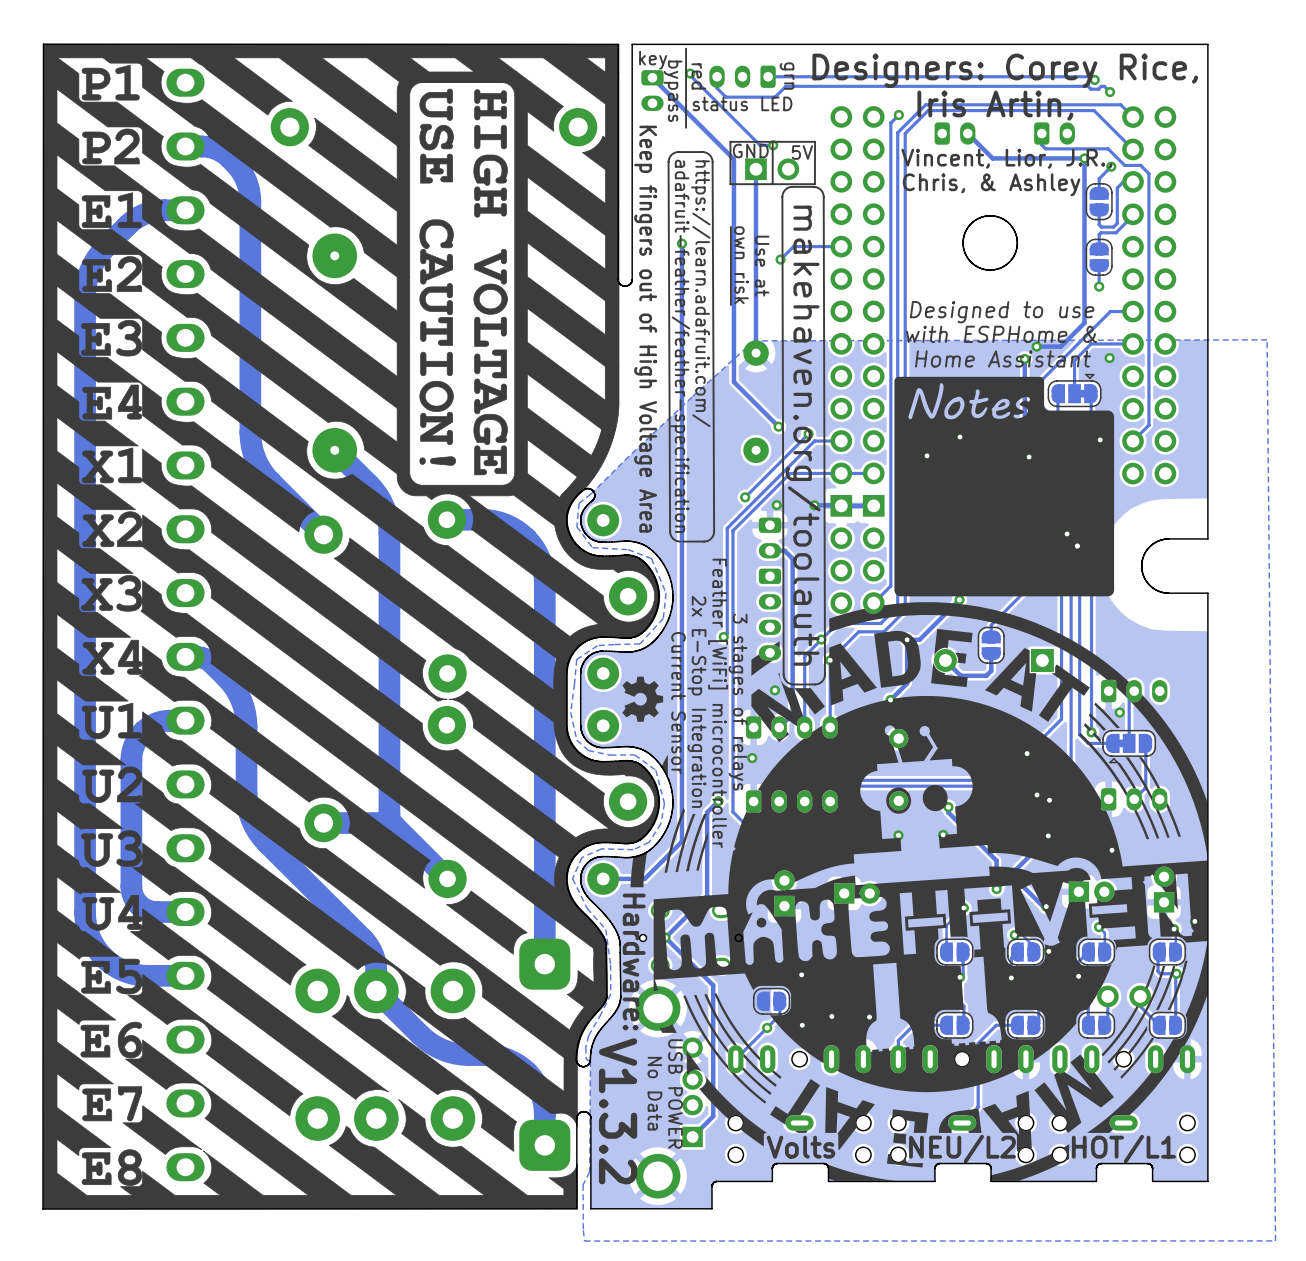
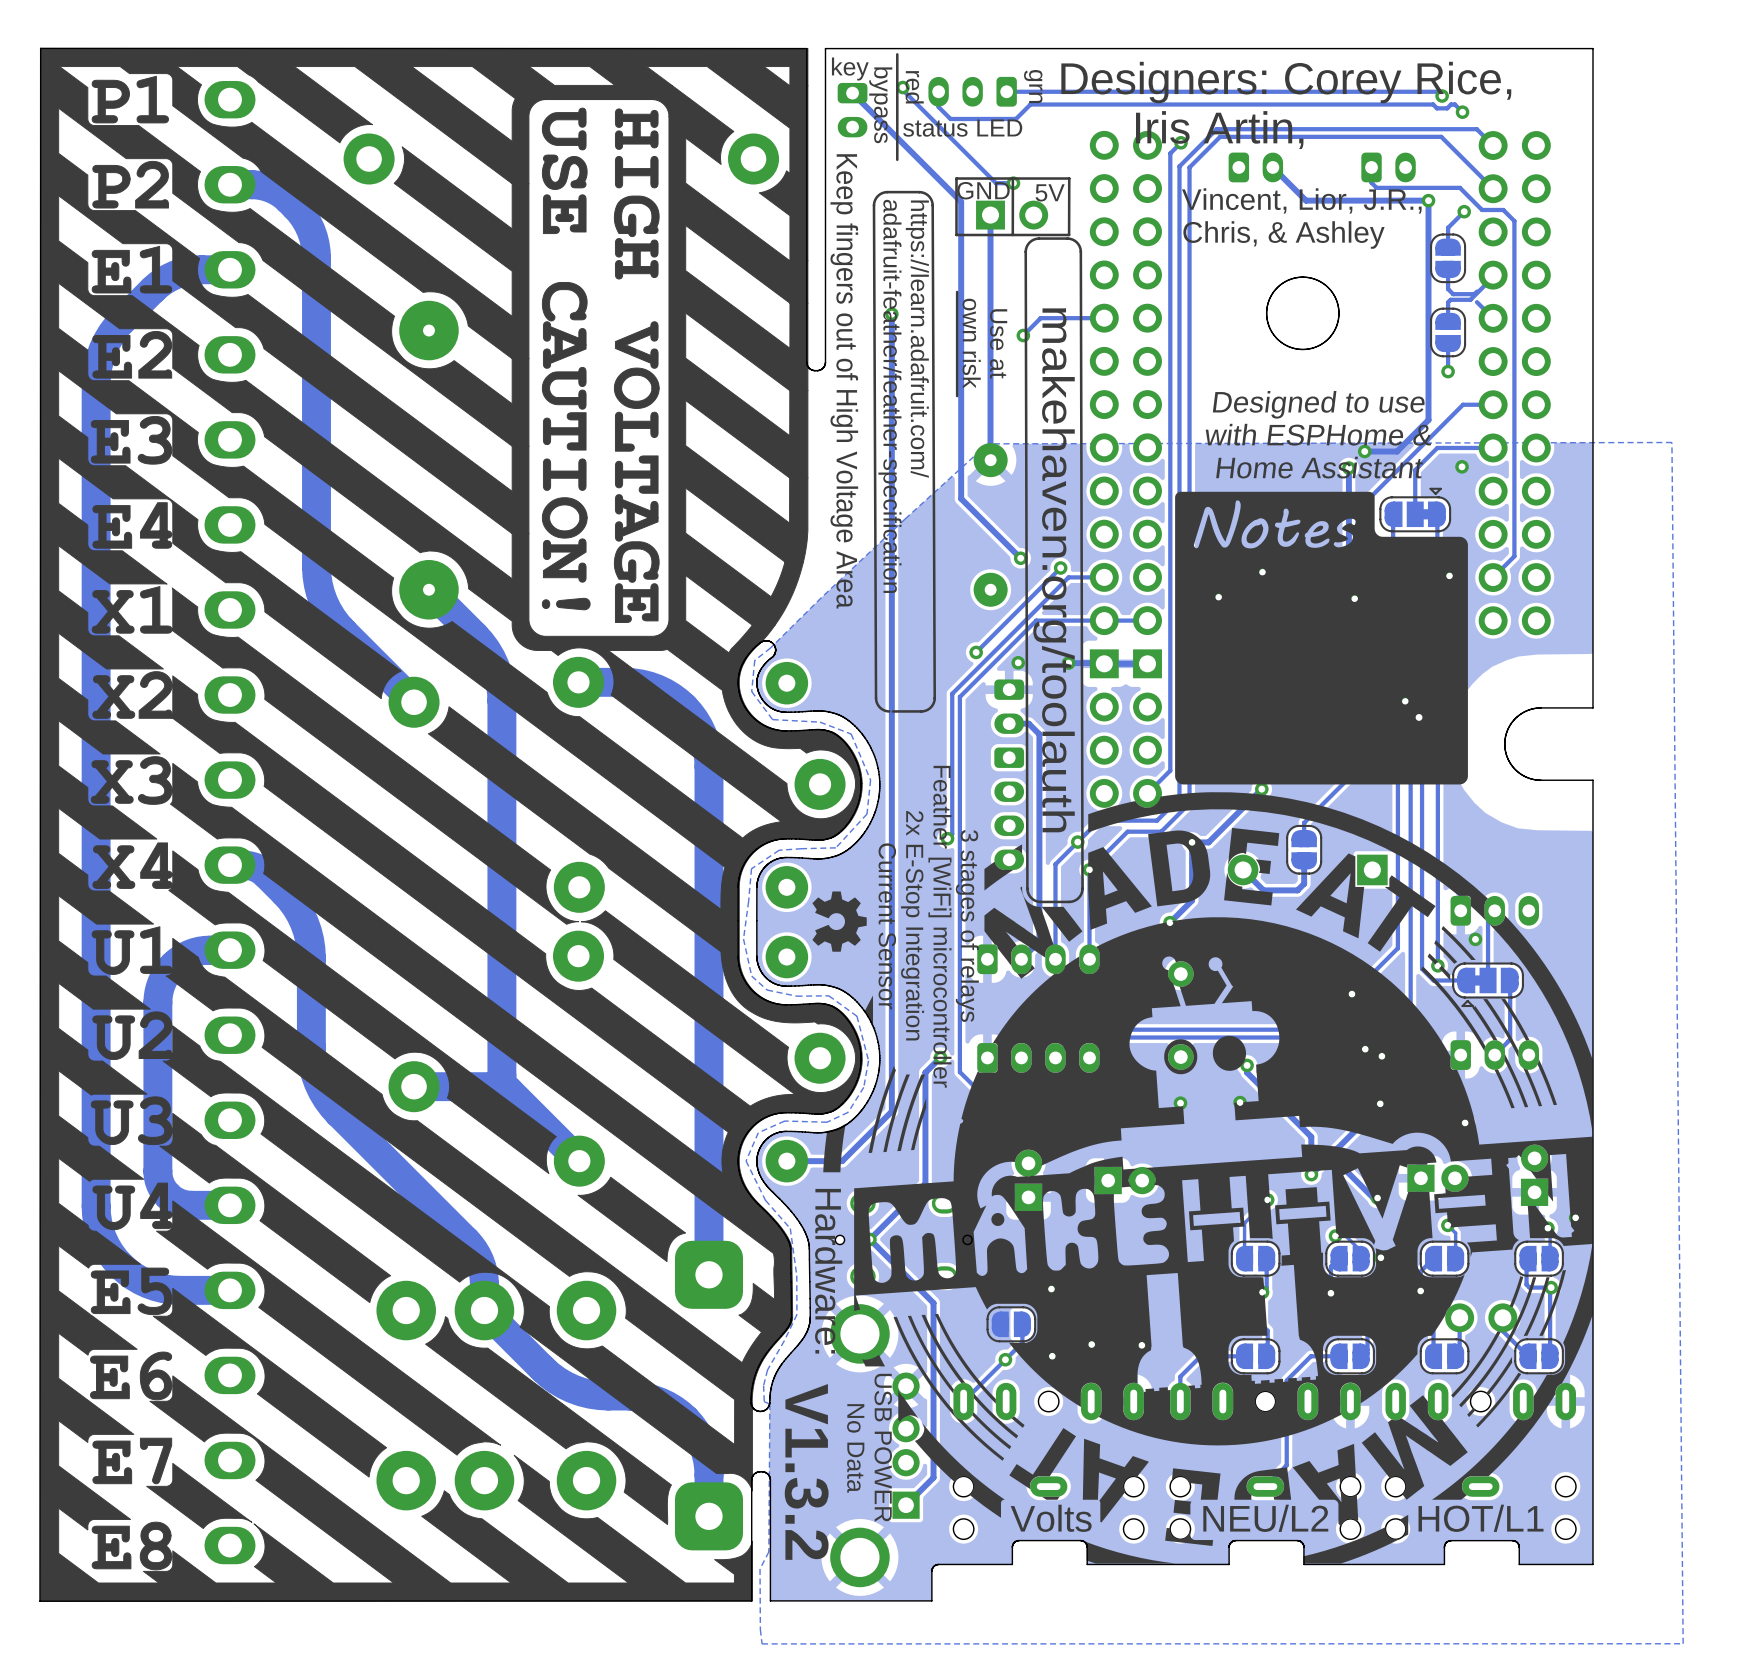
track: (1133, 181) (1123, 181) (1117, 188) (1117, 223) (1113, 227) (1101, 227) -> (1476, 291) (1474, 294) (1453, 294) (1451, 292)
track: none -> (1476, 302) (1493, 318)
via: (774, 690) -> none
via: (752, 758) -> none

